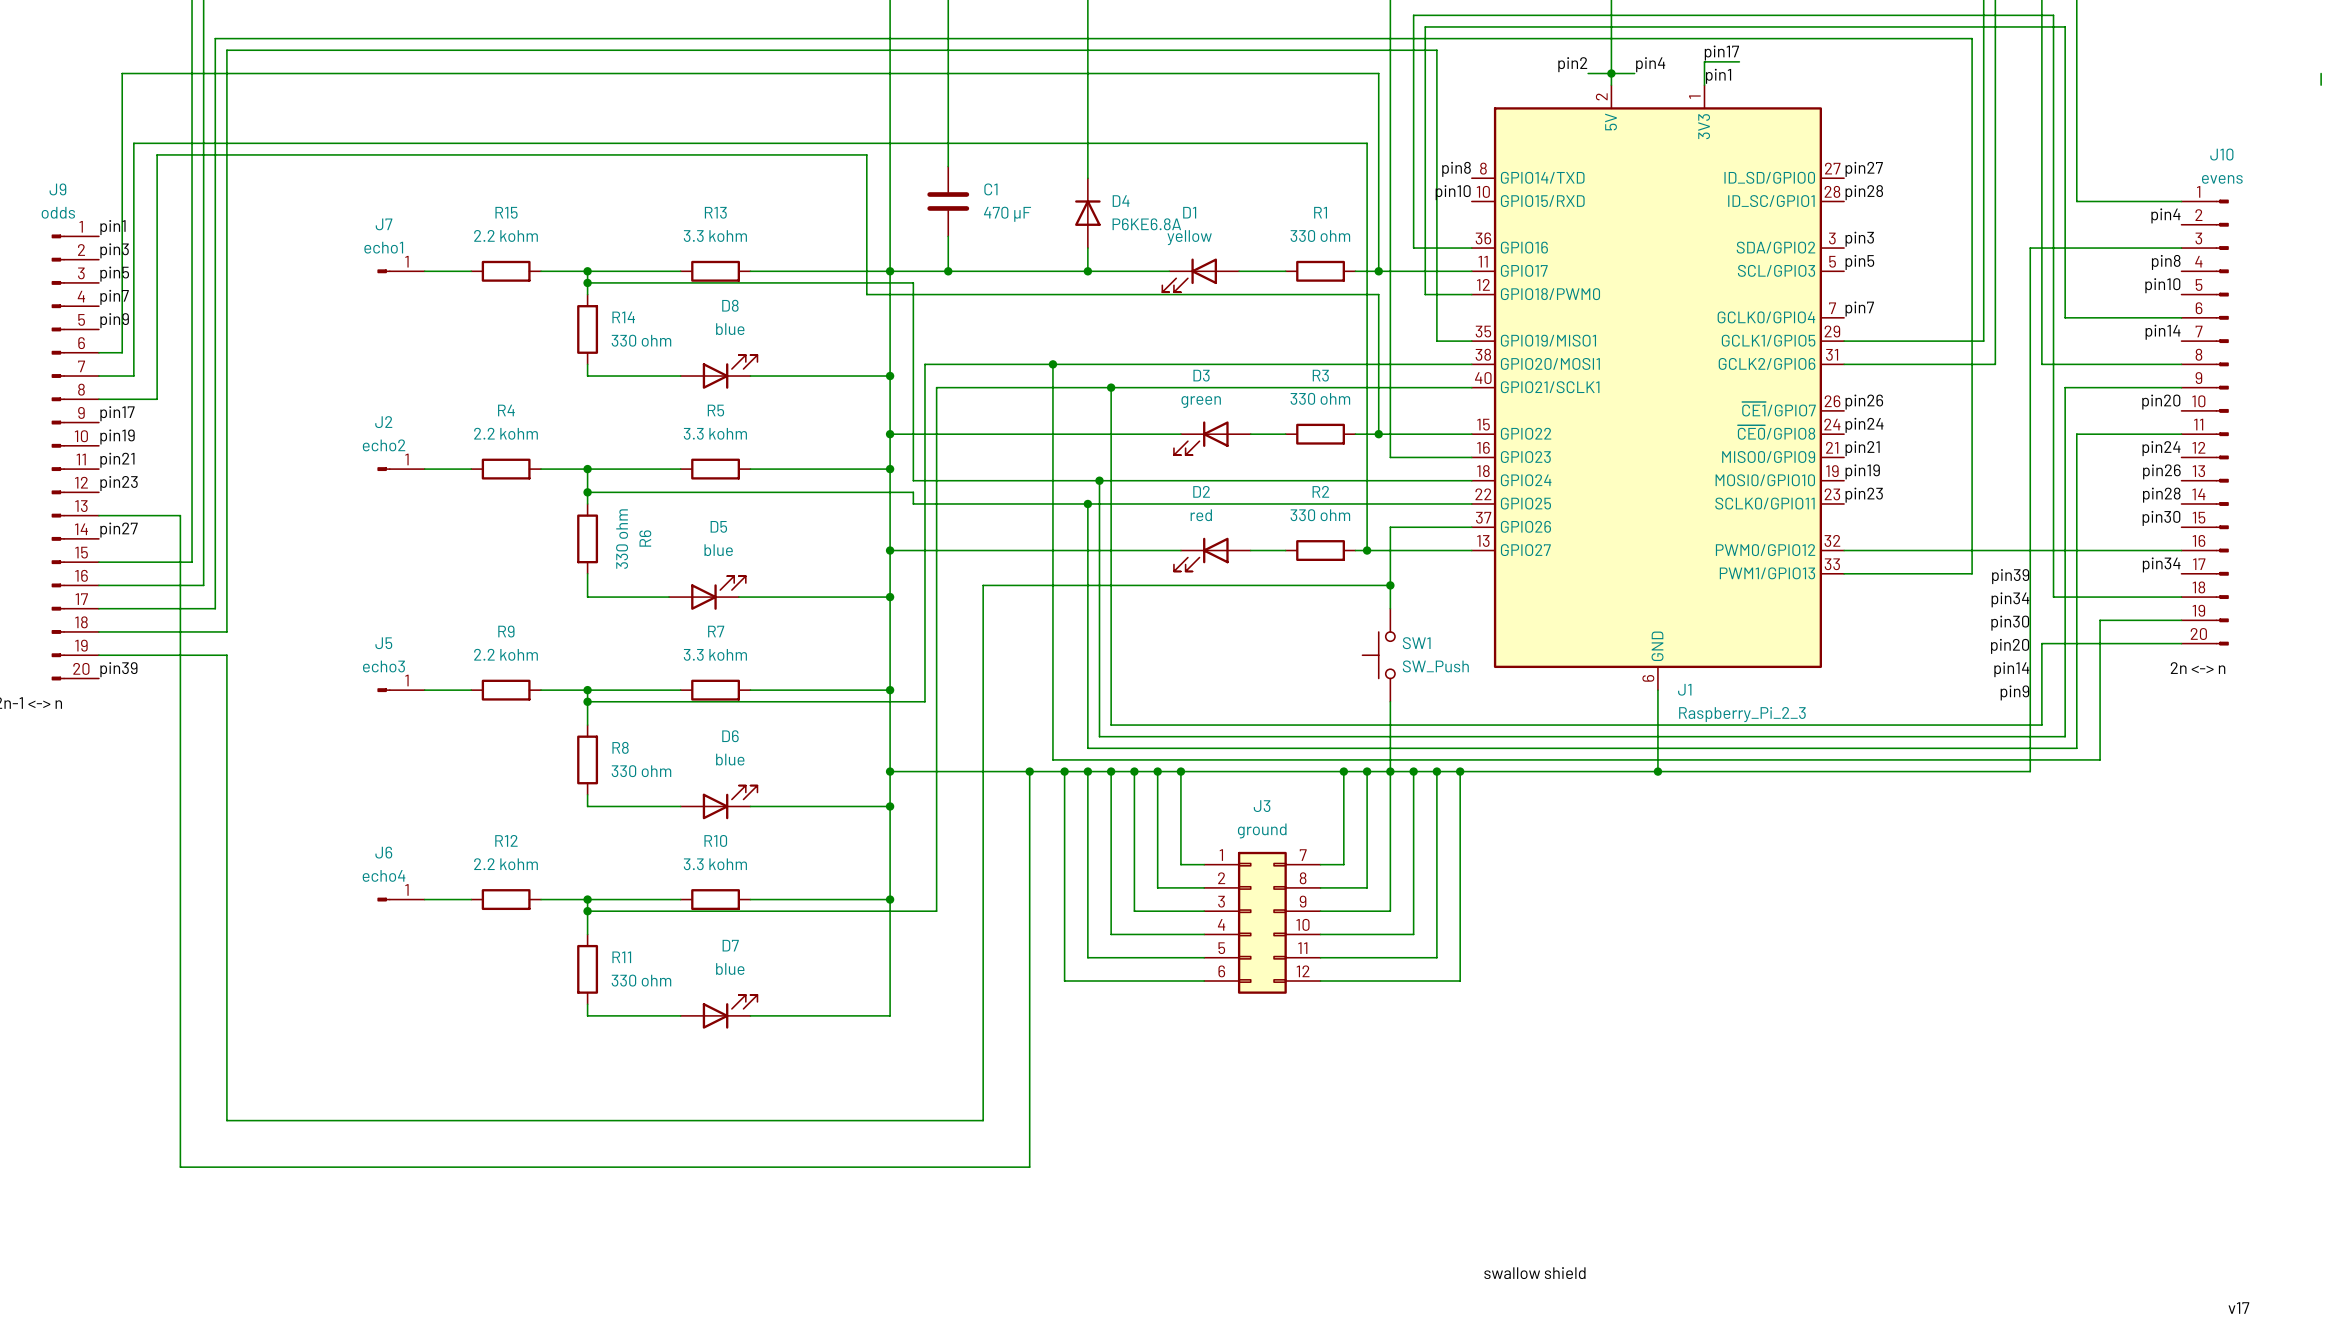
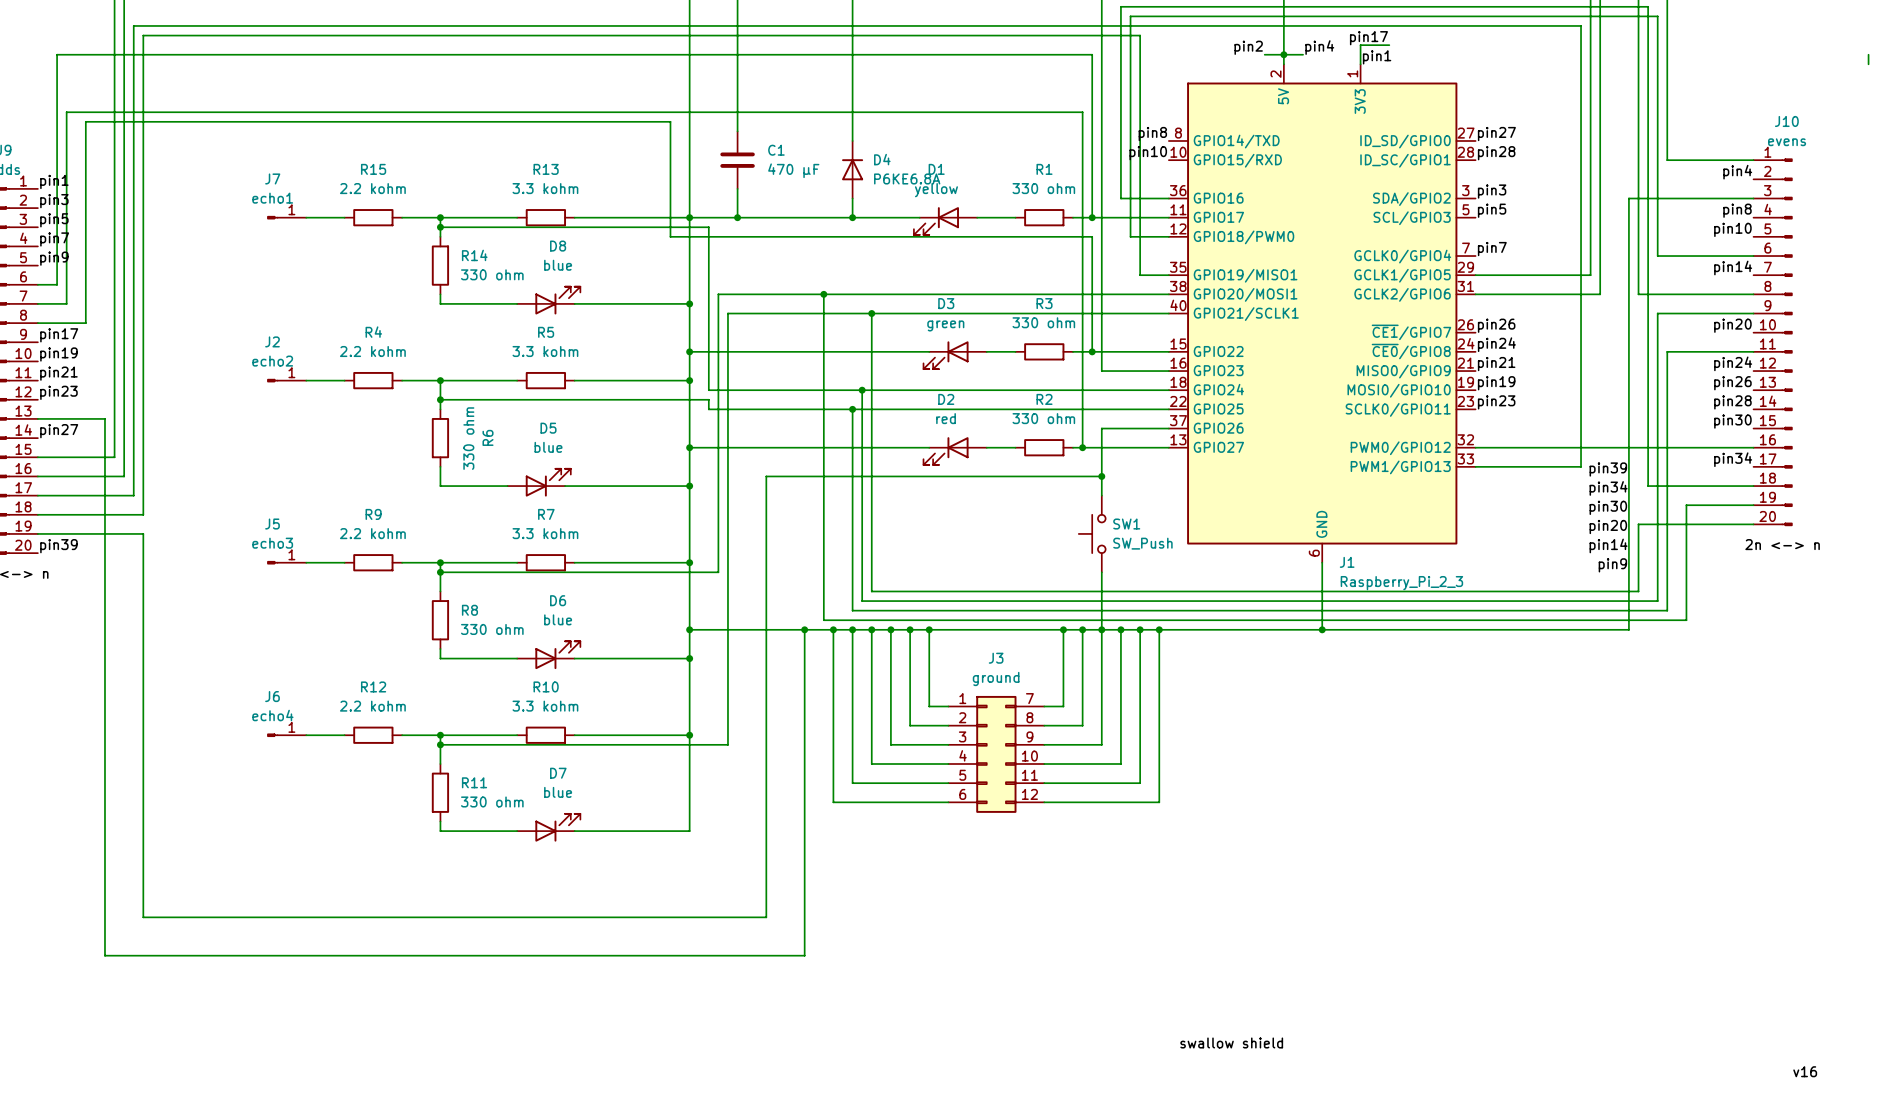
label: v17 (2238, 1308) -> v16 (1805, 1071)

